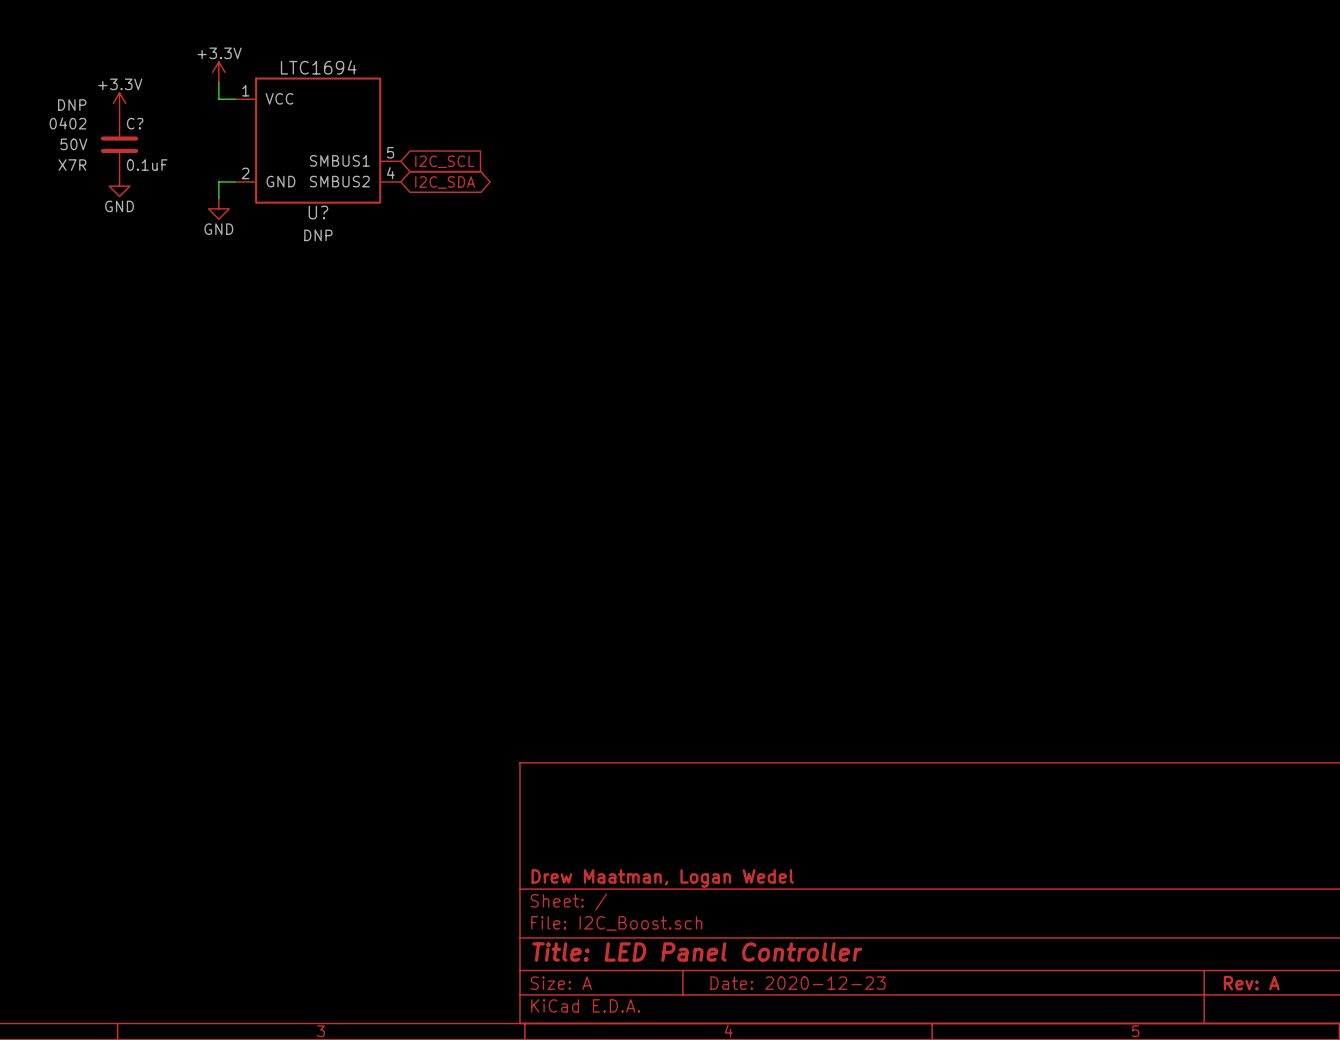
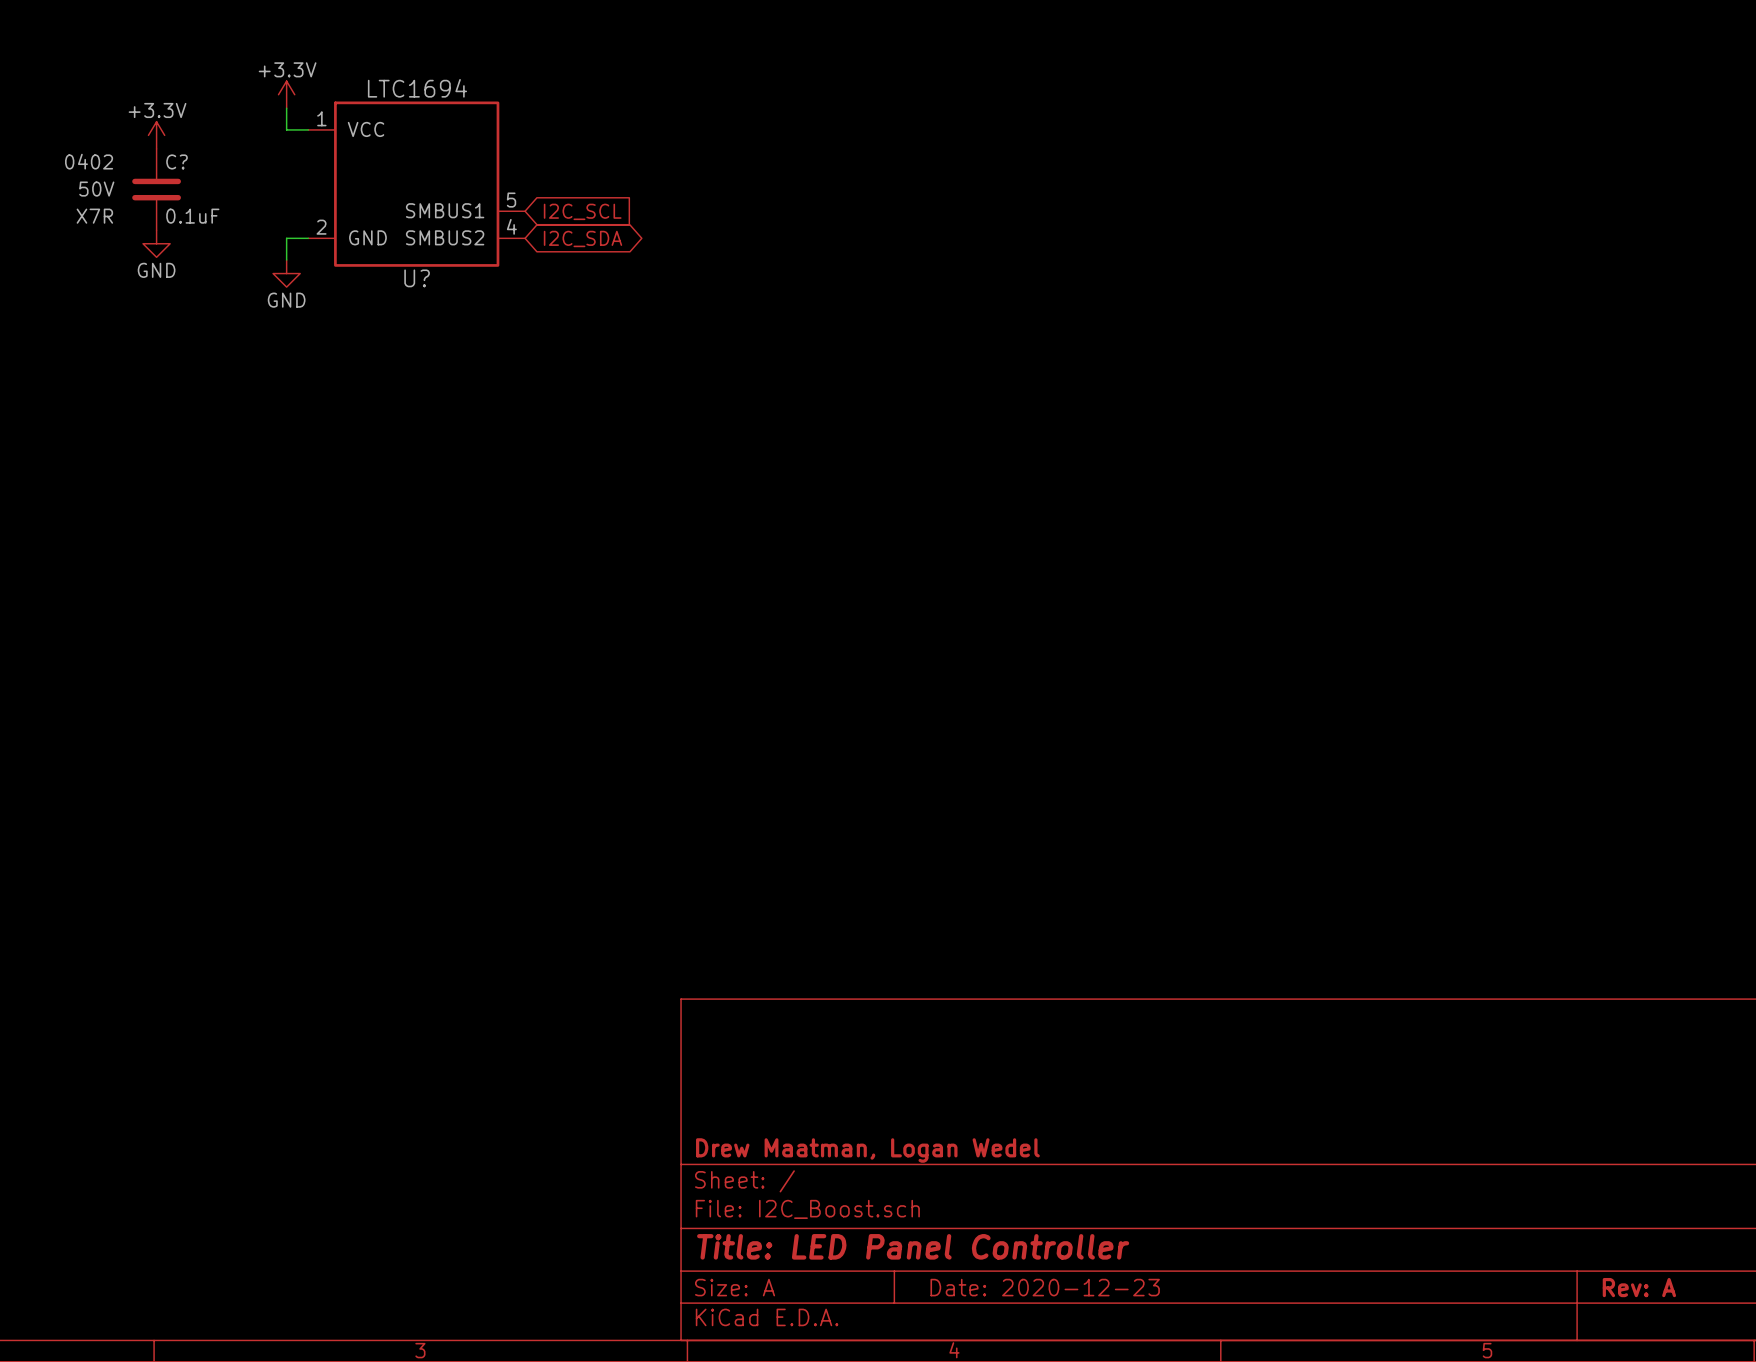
C? text: DNP (72, 105) -> none
U? text: DNP (318, 235) -> none

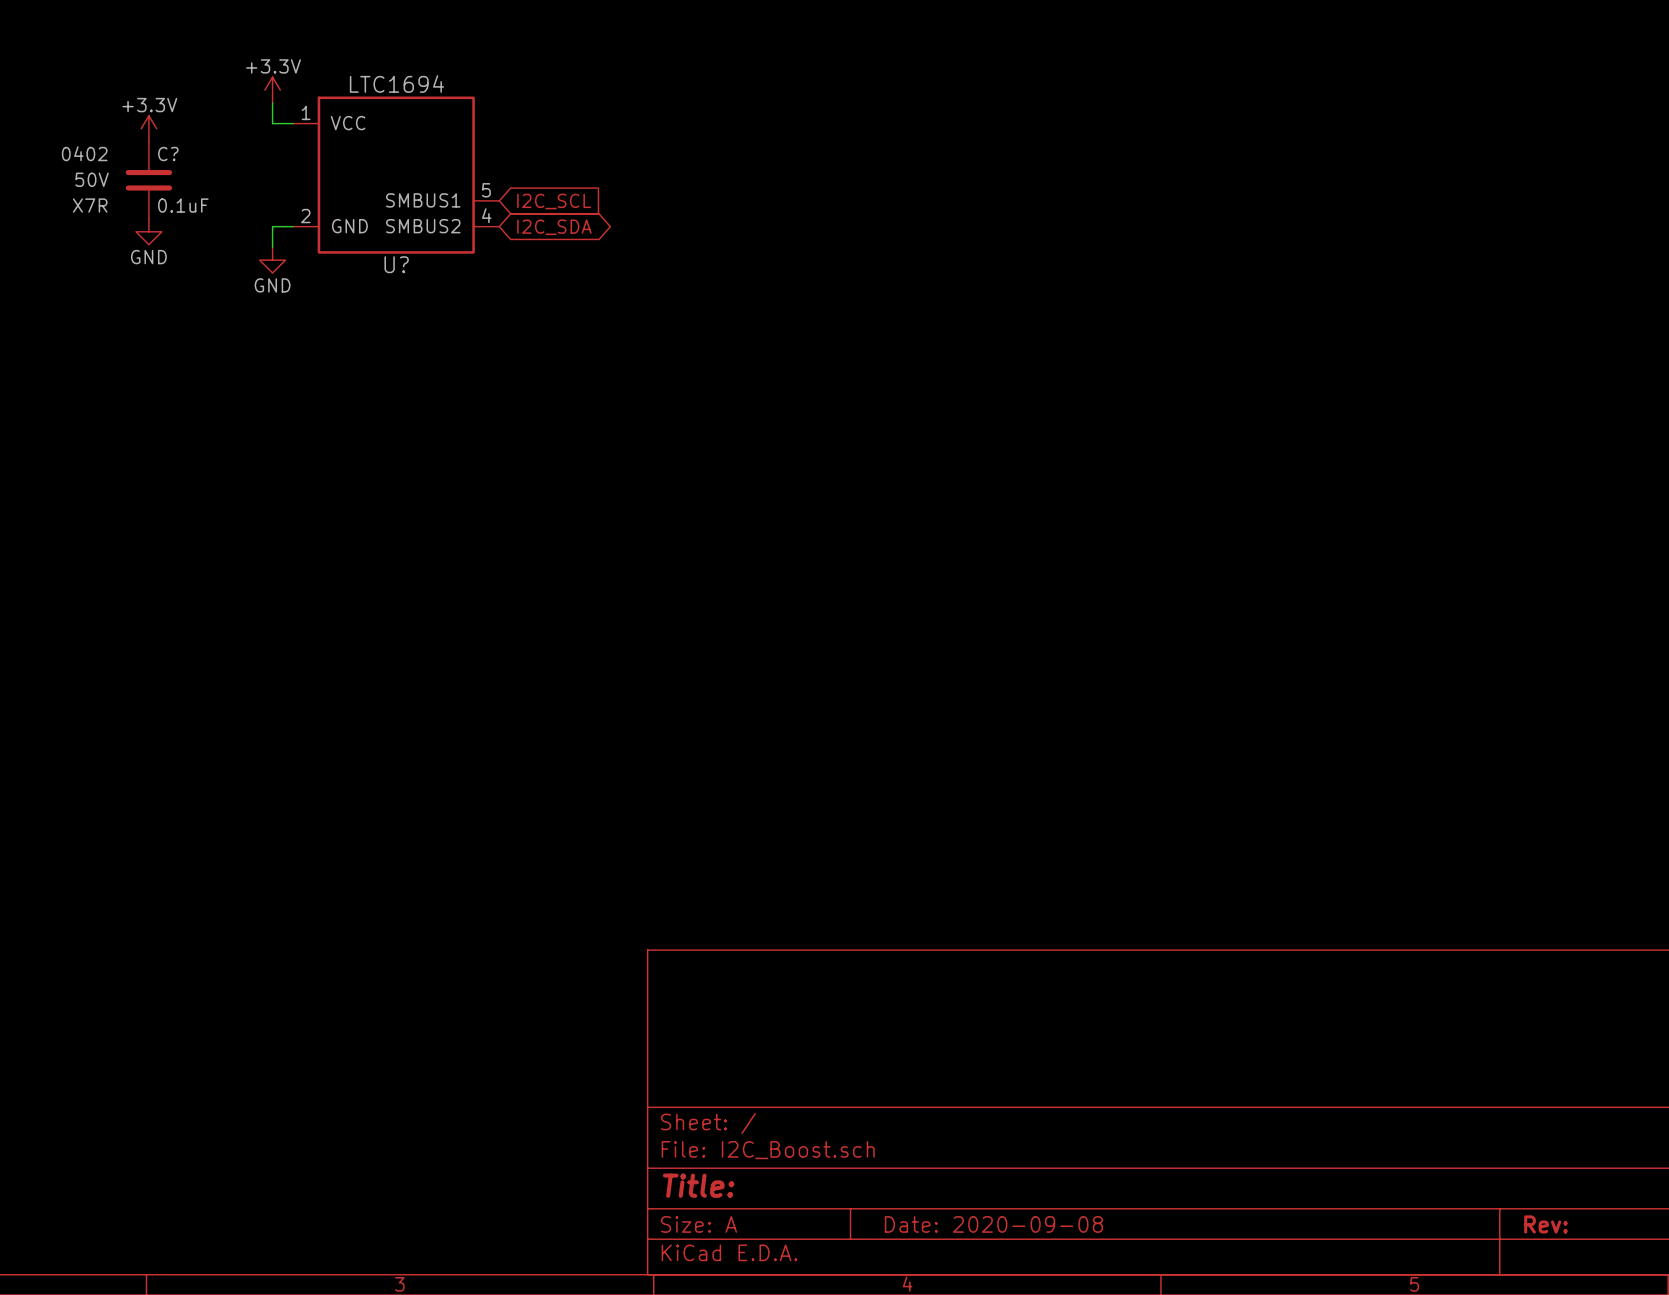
title block: Drew Maatman, Logan Wedel (867, 1150) -> none
title block: Title: LED Panel Controller (913, 1246) -> Title: (698, 1185)
title block: Date: 2020-12-23 (1045, 1287) -> Date: 2020-09-08 (993, 1224)
title block: Rev: A (1639, 1287) -> Rev: (1545, 1224)

